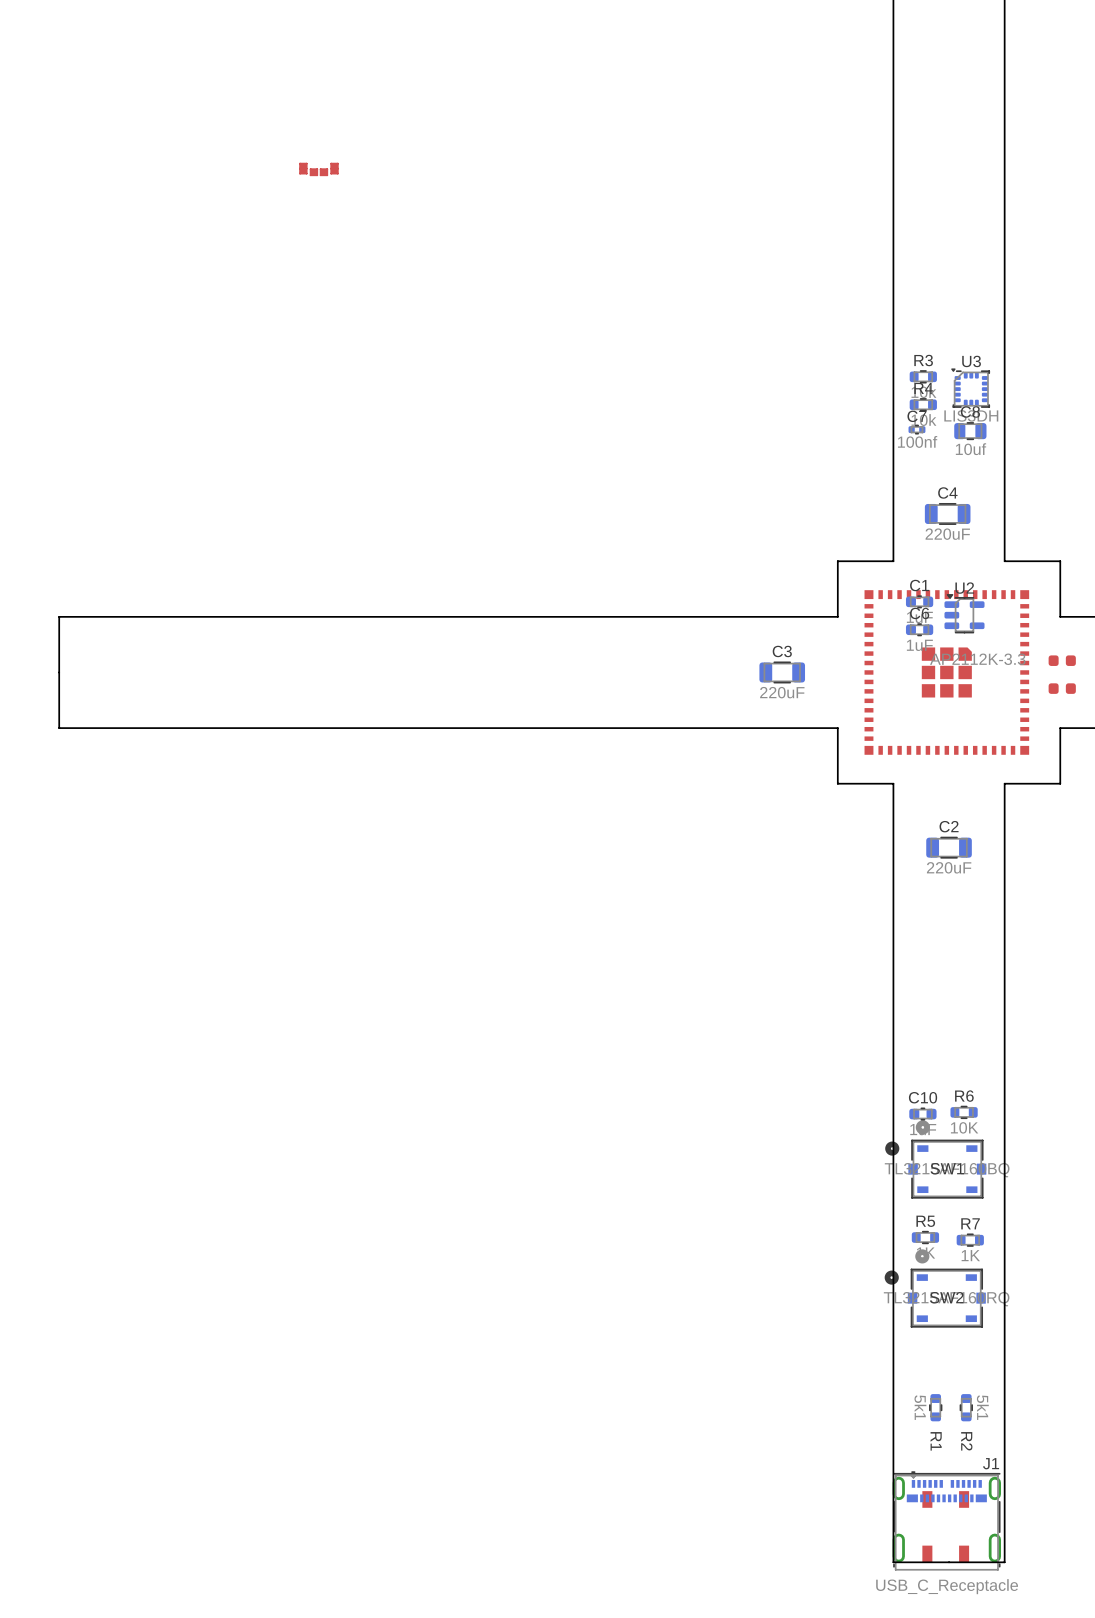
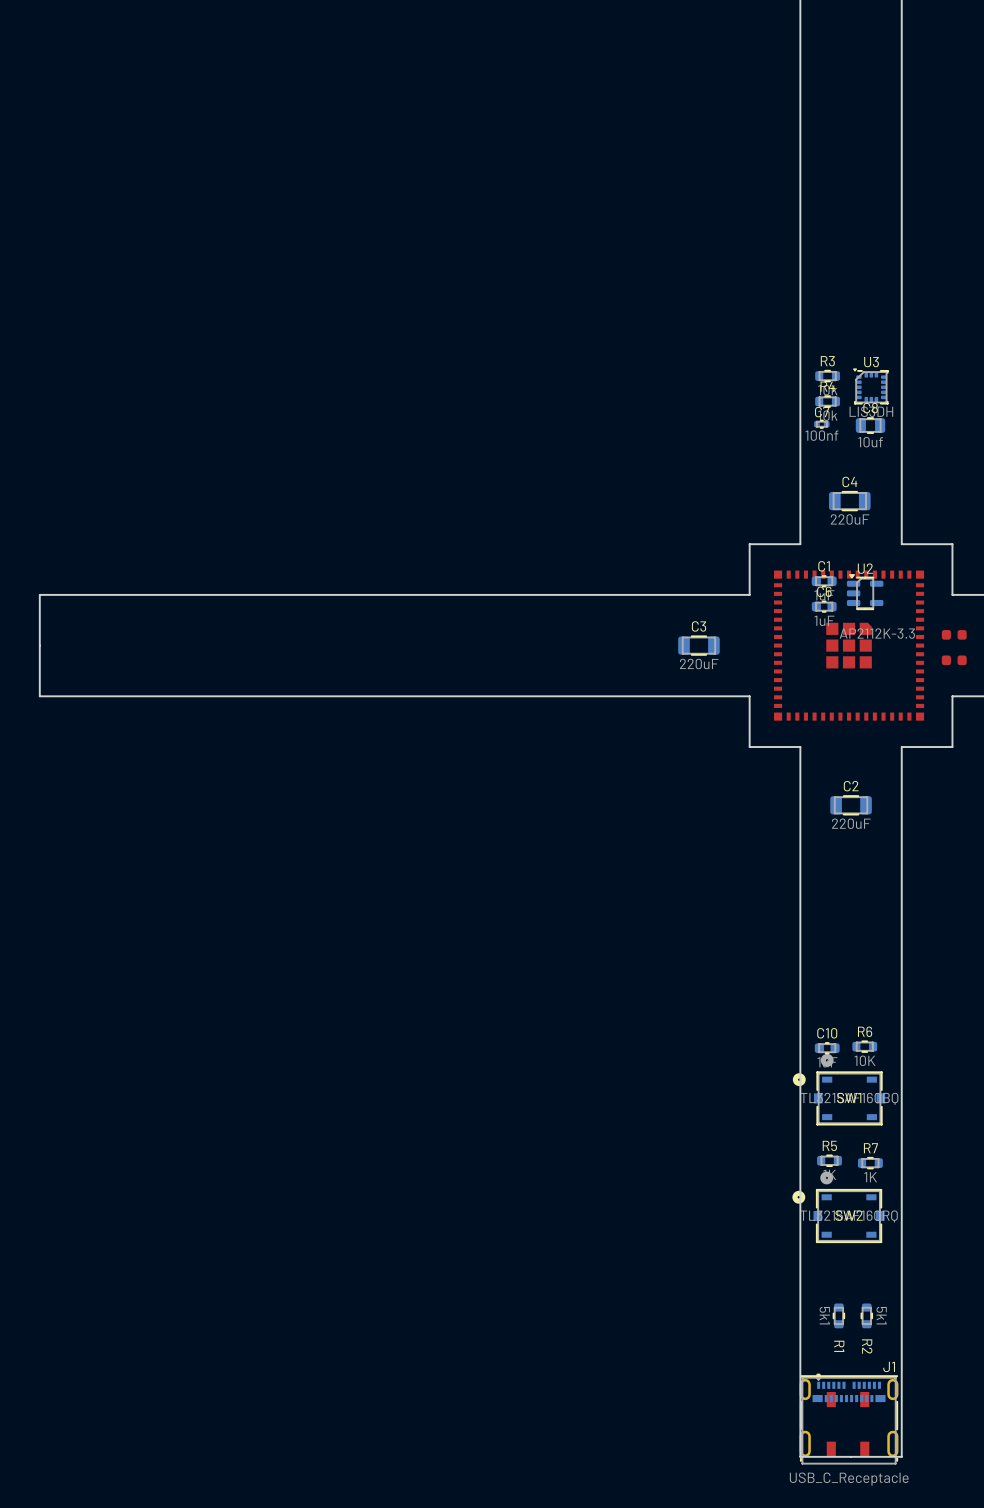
part: (318, 169) -> none

